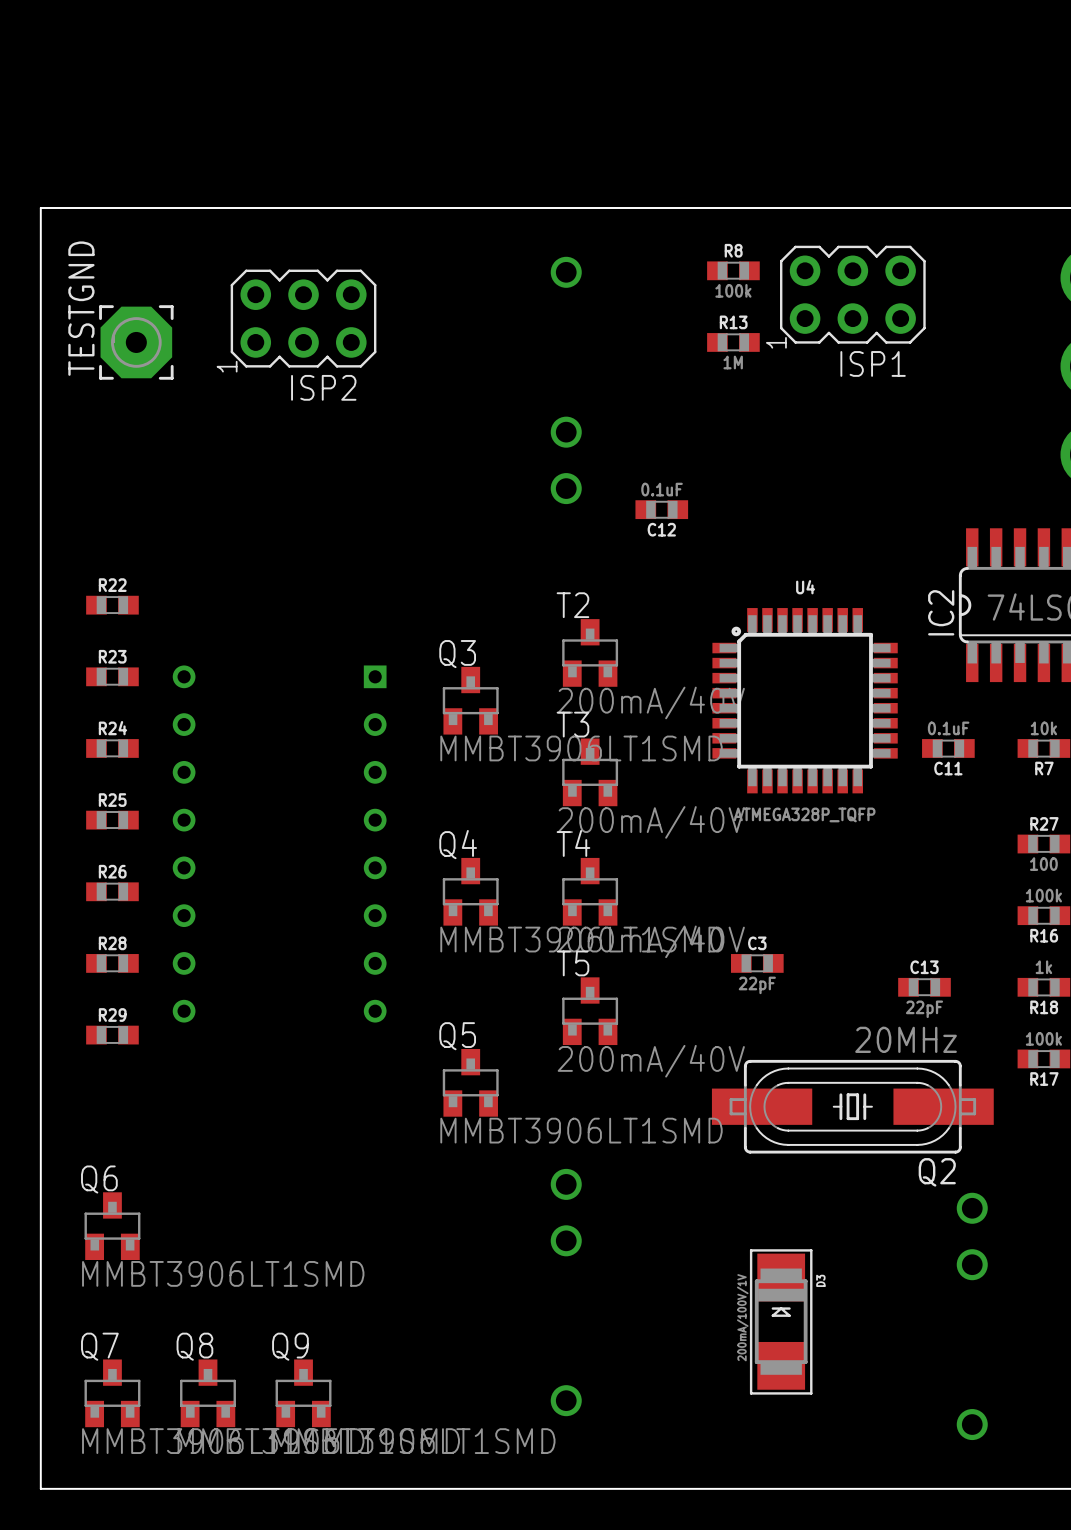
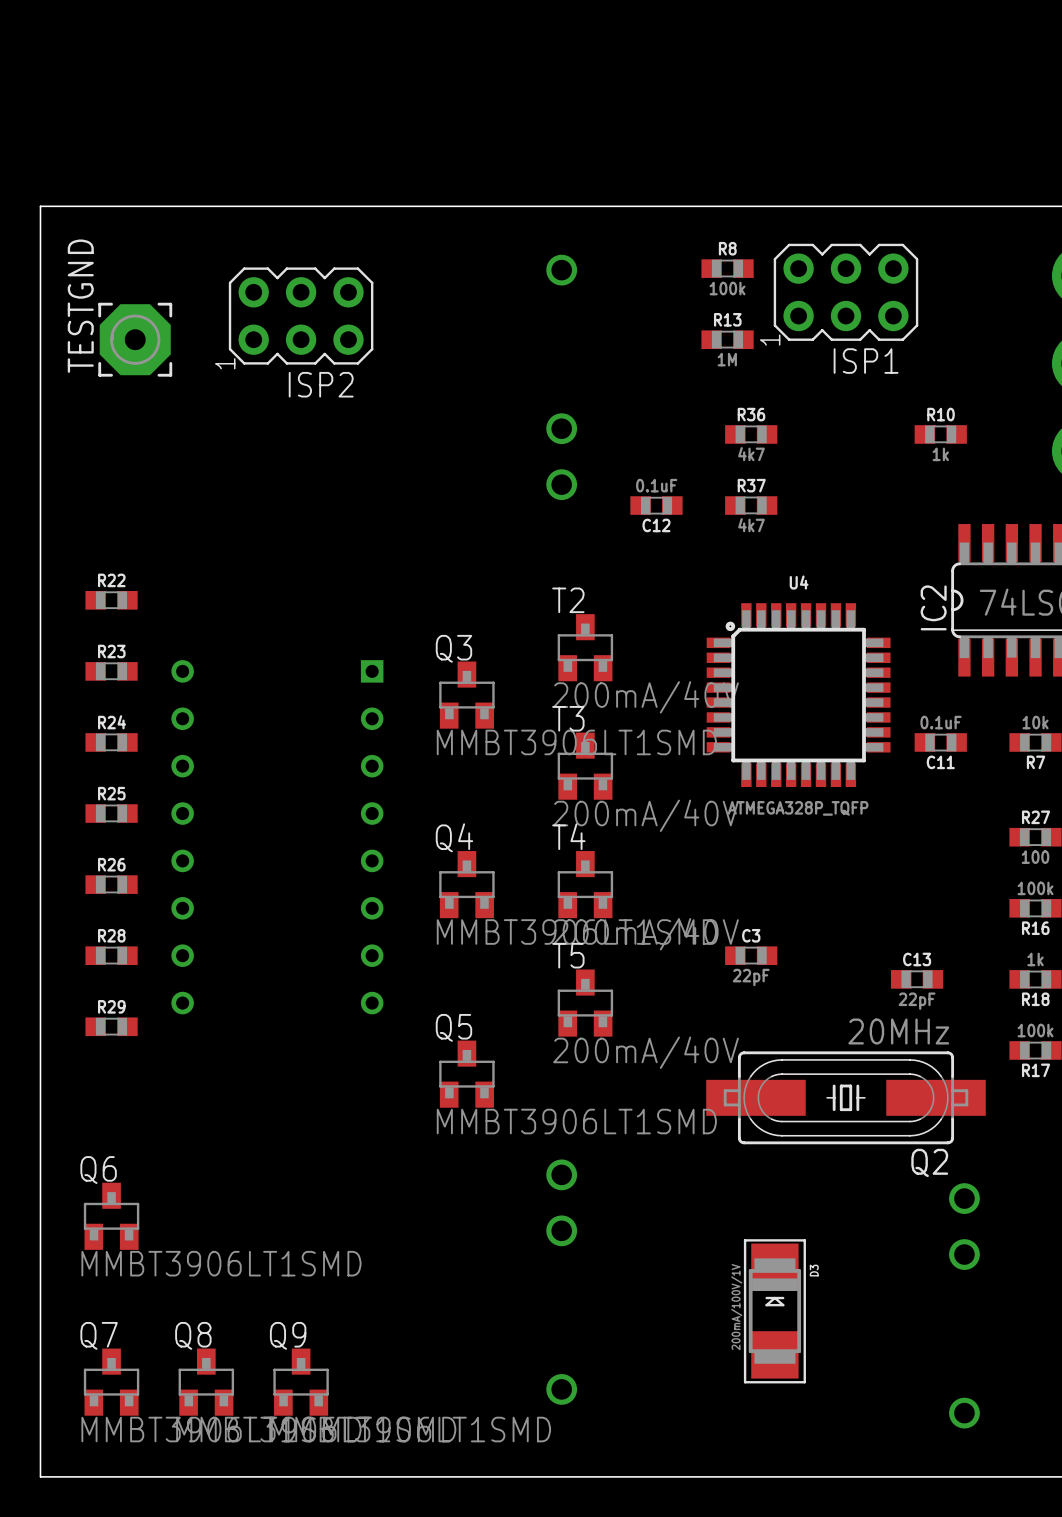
R36: none -> 4k7 (751, 434)
R10: none -> 1k (940, 434)
R37: none -> 4k7 (751, 505)

